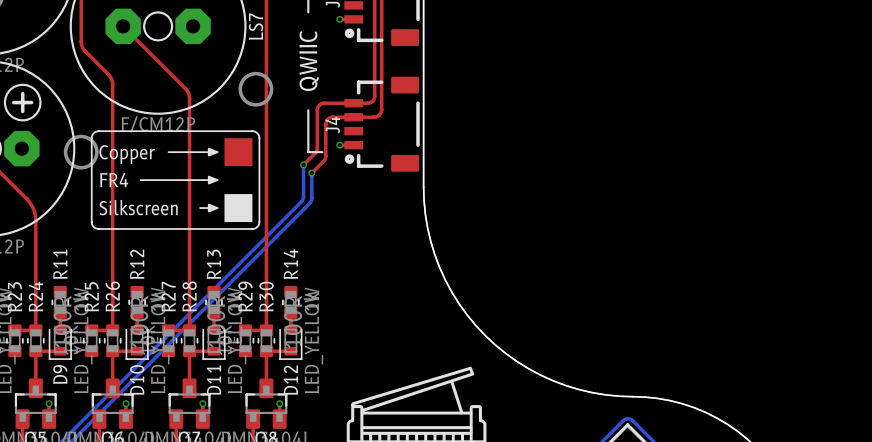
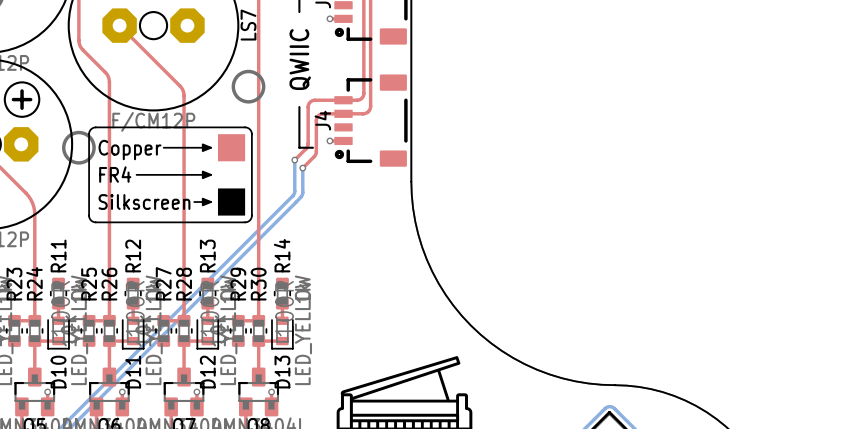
D9 name: D9 (60, 374) -> D10 (58, 372)
D10 name: D10 (137, 379) -> D11 (133, 372)
D11 name: D11 (214, 380) -> D12 (207, 372)
D12 name: D12 (290, 380) -> D13 (282, 372)

